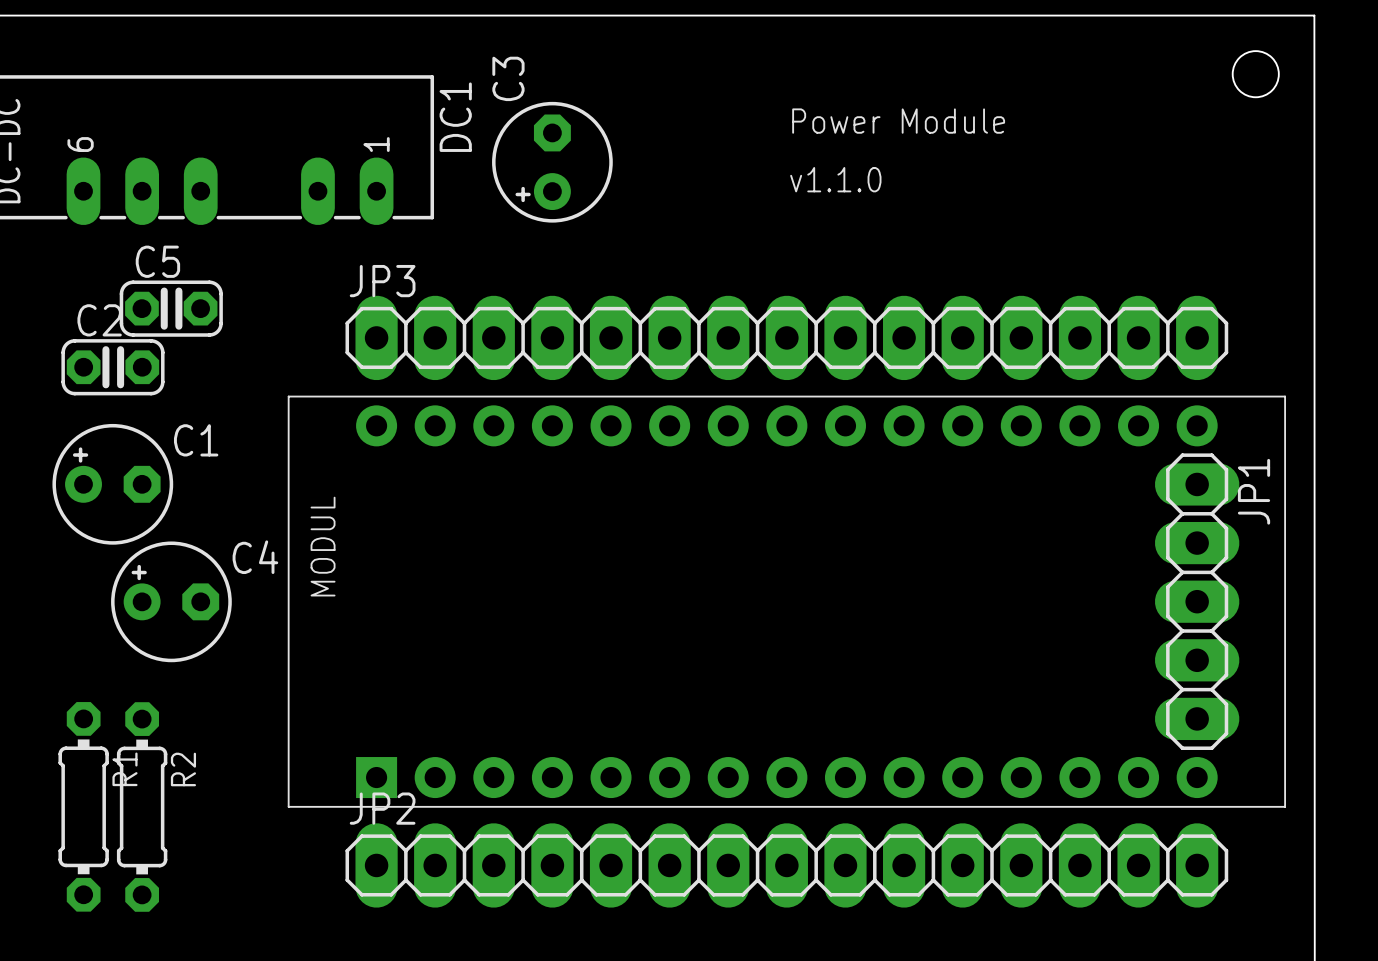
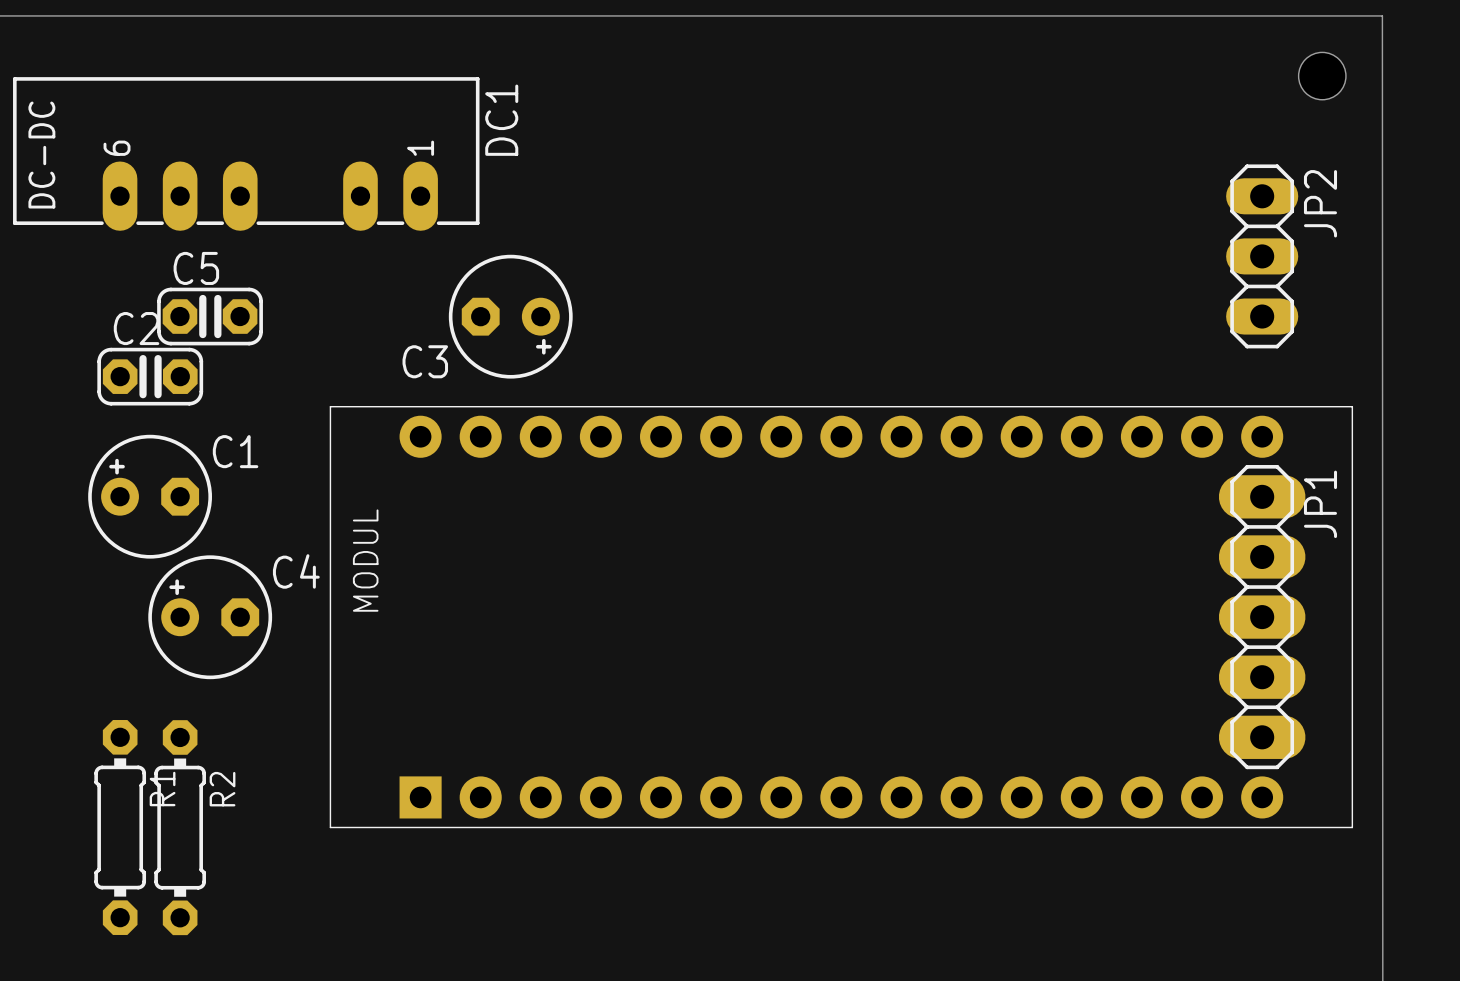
text: Power Module (898, 121) -> none
C3 rotation: 0° (552, 162) -> 90° counterclockwise (510, 316)
C3 position: (552, 162) -> (510, 316)
text: v1.1.0 (835, 179) -> none
JP3: (786, 337) -> none
JP2 name position: JP2 (382, 808) -> JP2 (1320, 203)
JP2 footprint: [345, 823, 1229, 908] -> [1226, 164, 1299, 349]

